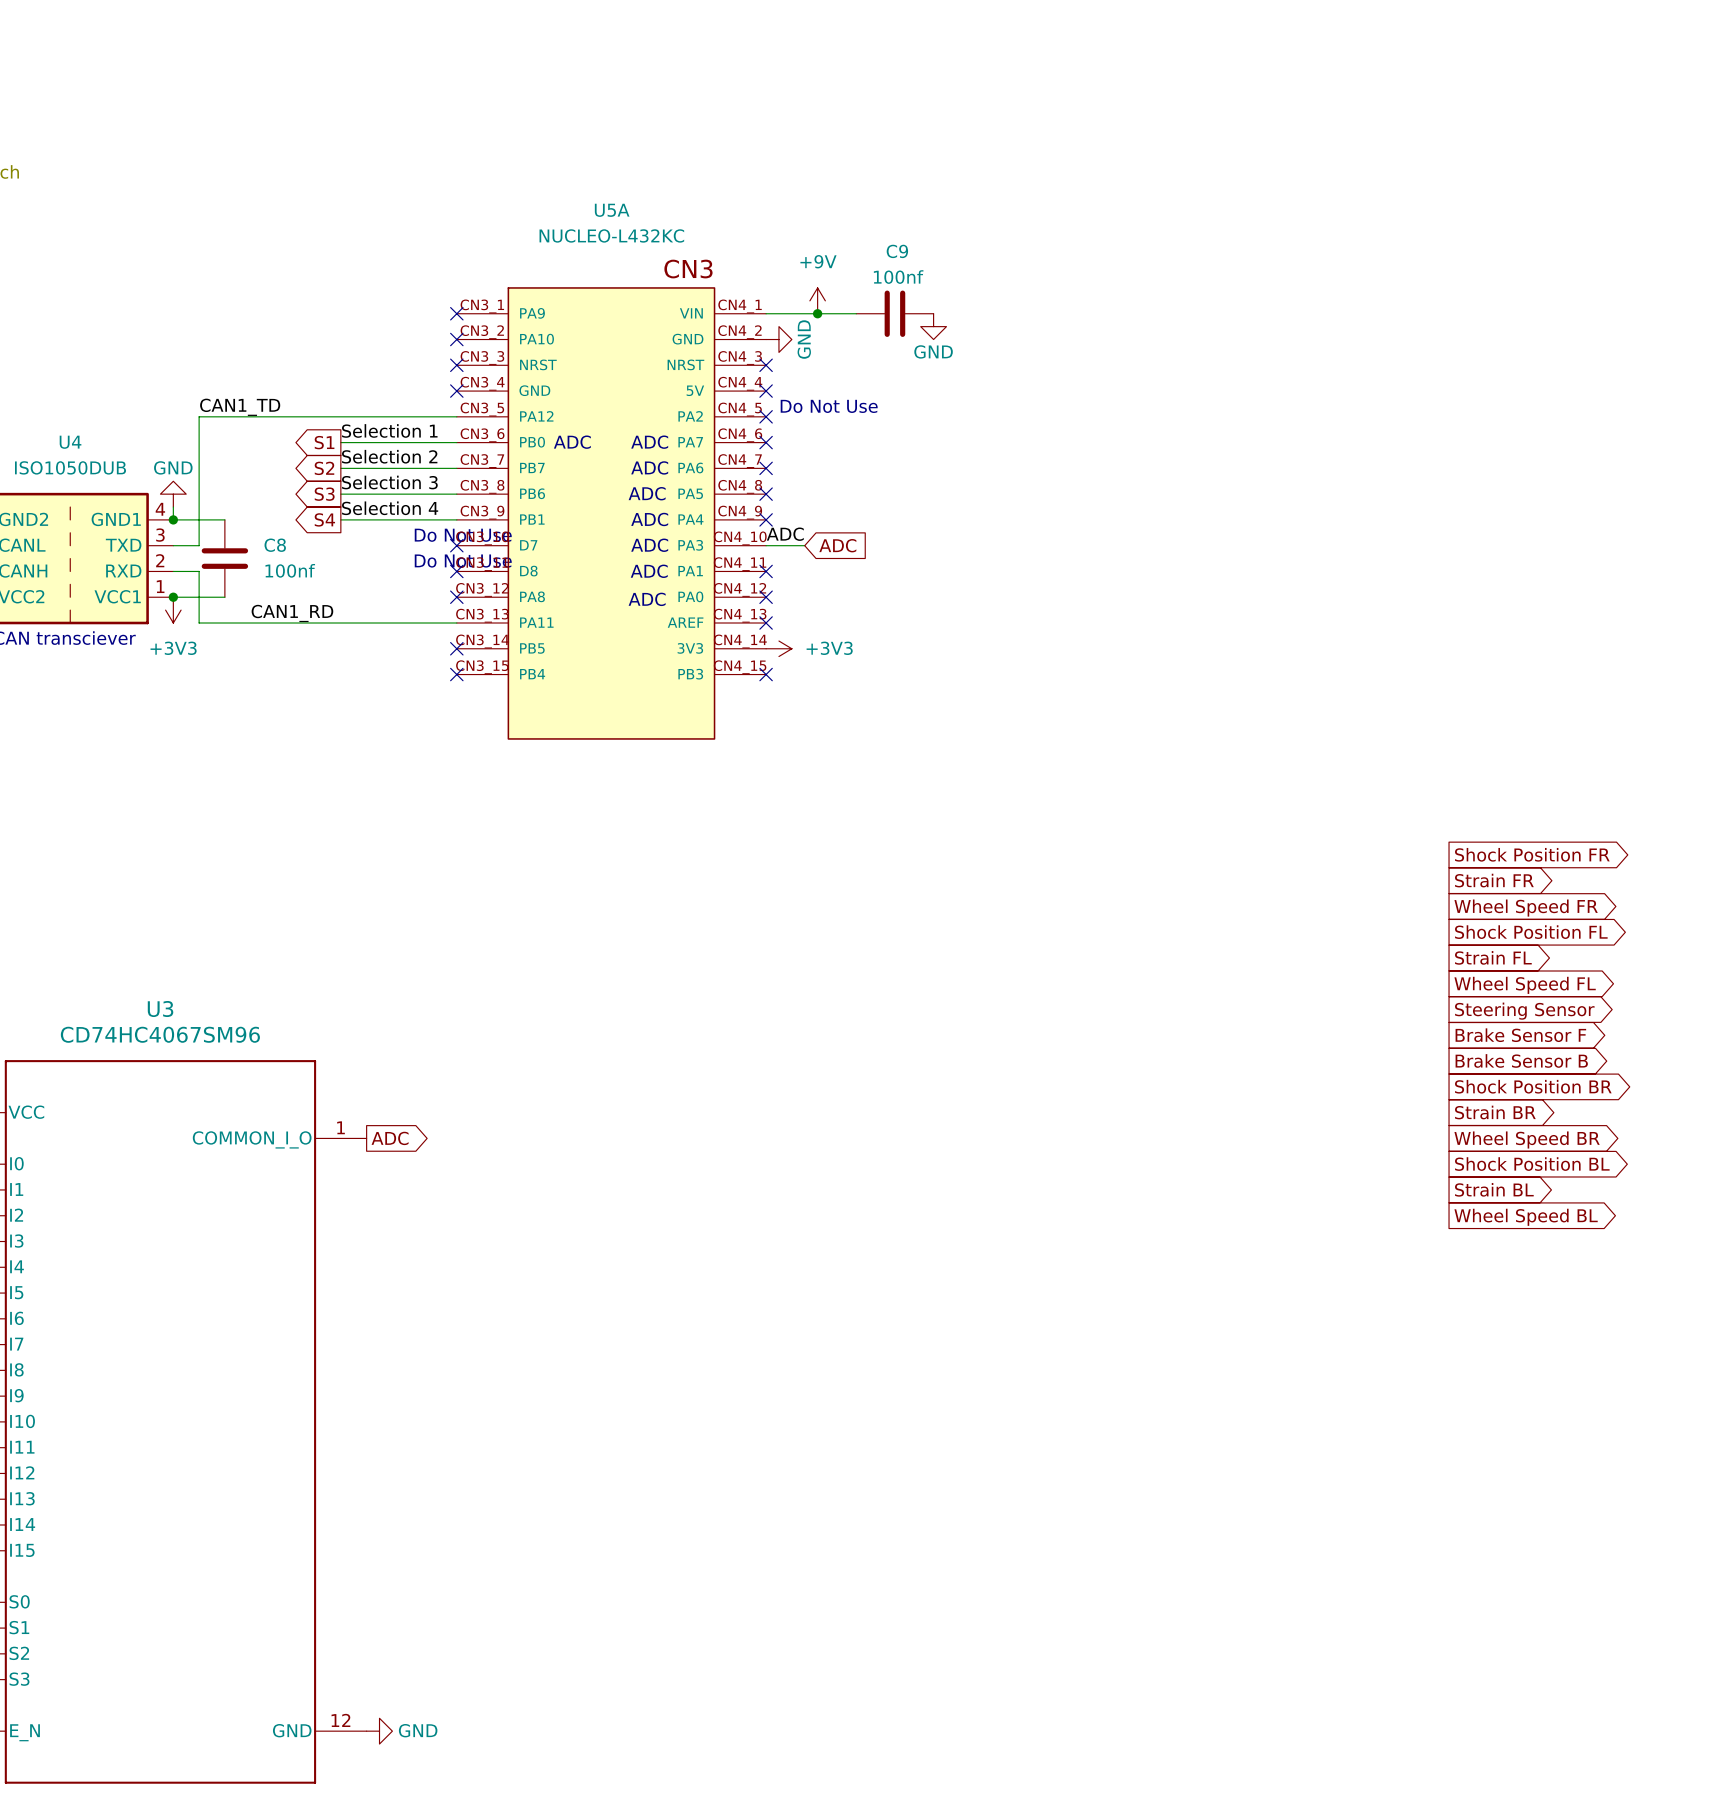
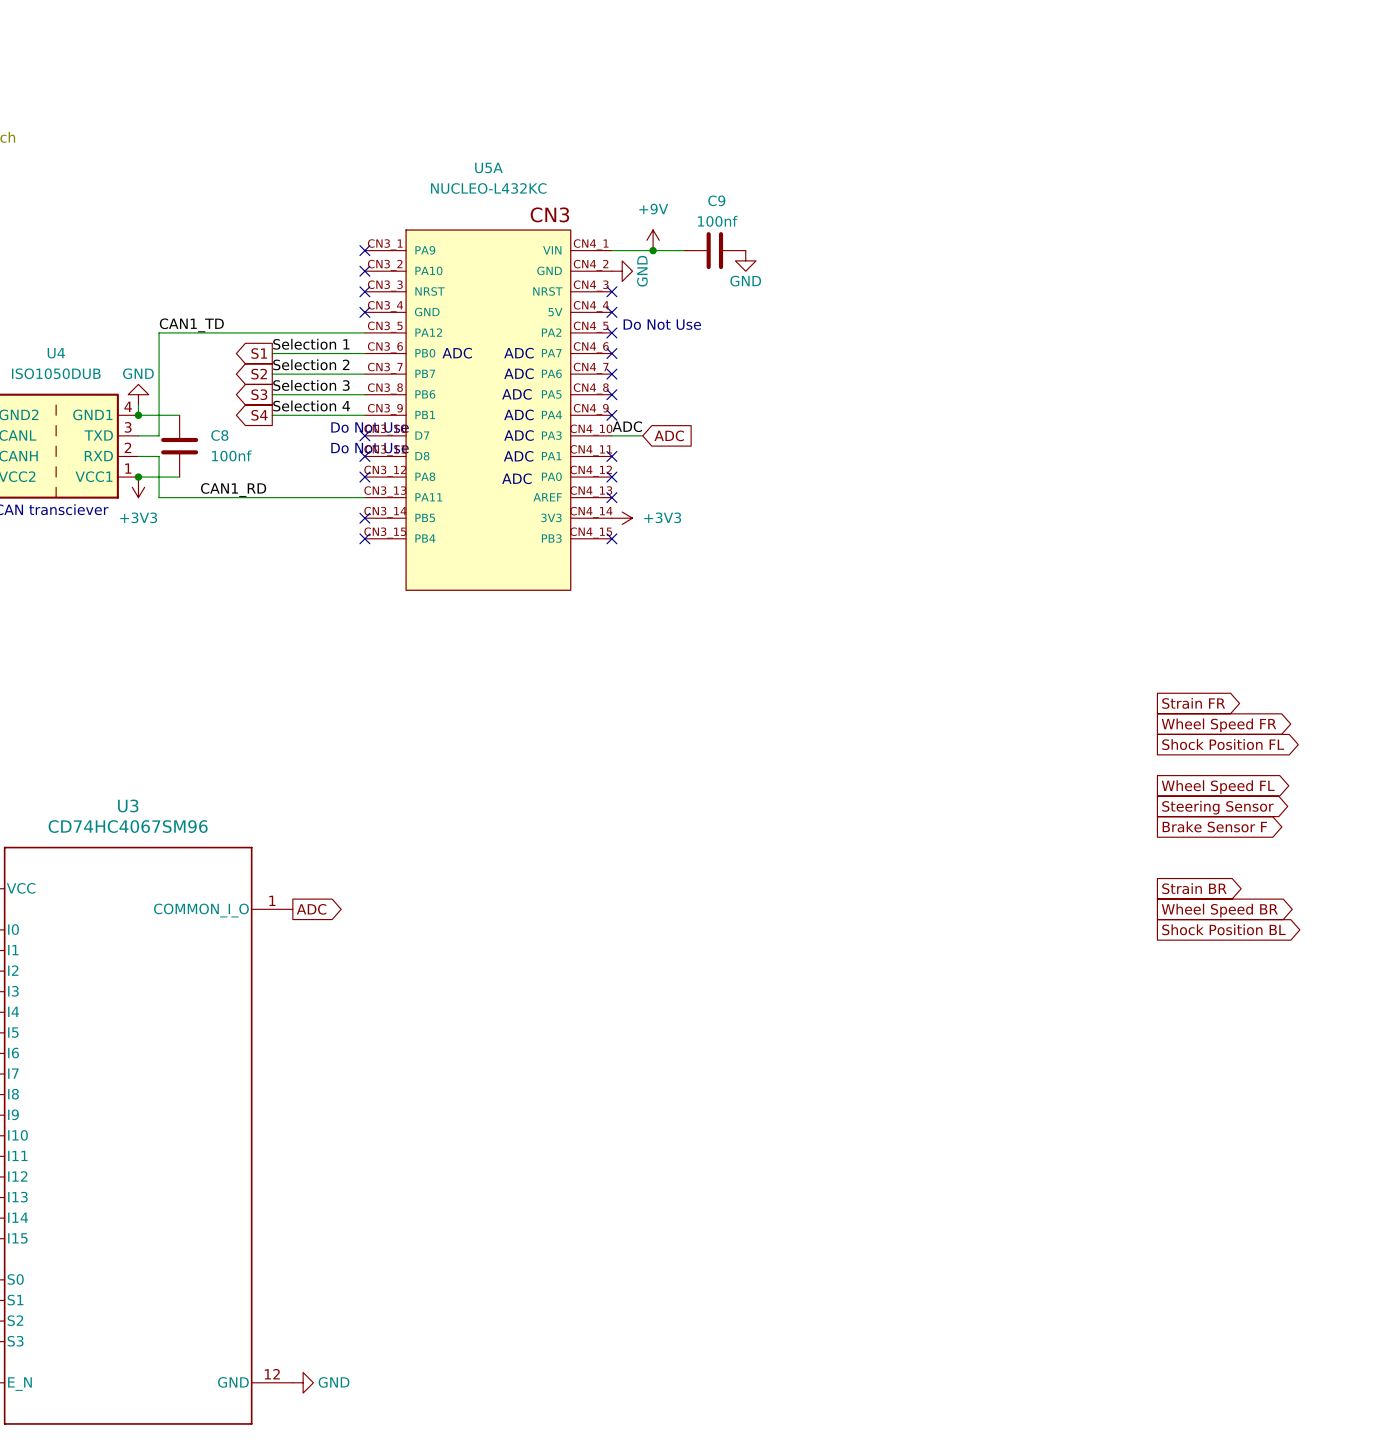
global label: Shock Position FR (1532, 854) -> none
global label: Strain FL (1493, 957) -> none
global label: Brake Sensor B (1521, 1060) -> none
global label: Shock Position BR (1533, 1086) -> none
global label: Strain BL (1494, 1189) -> none
global label: Wheel Speed BL (1526, 1217) -> none

